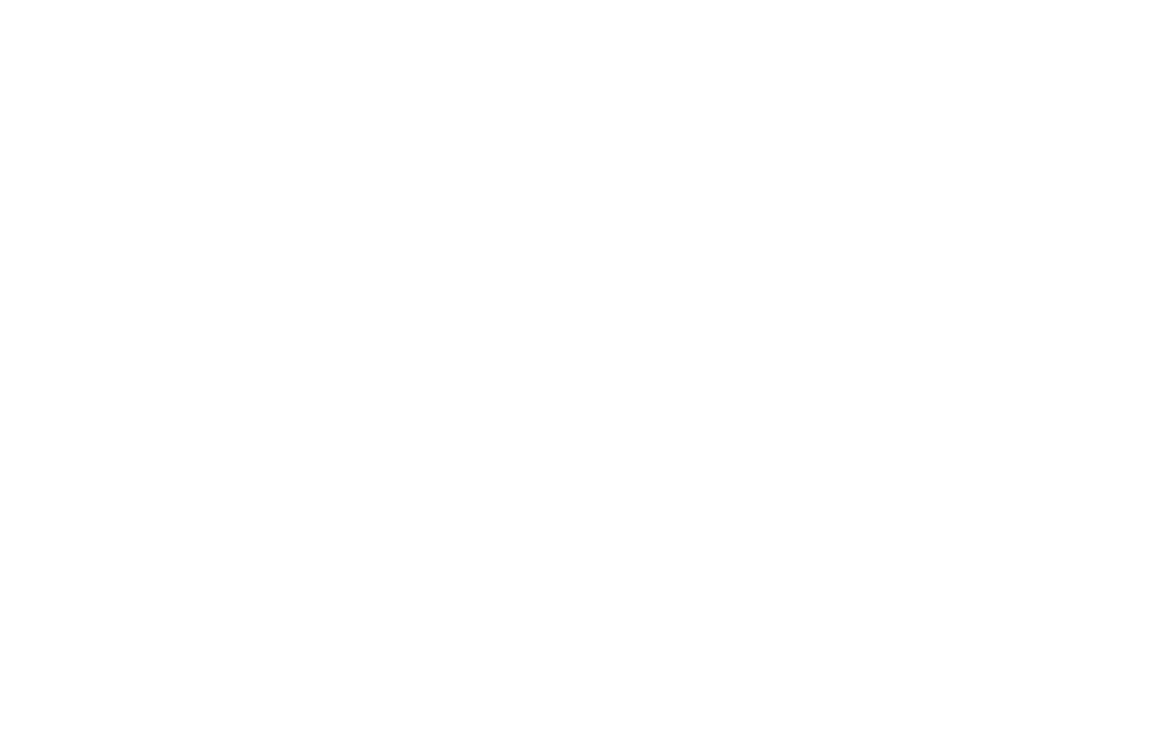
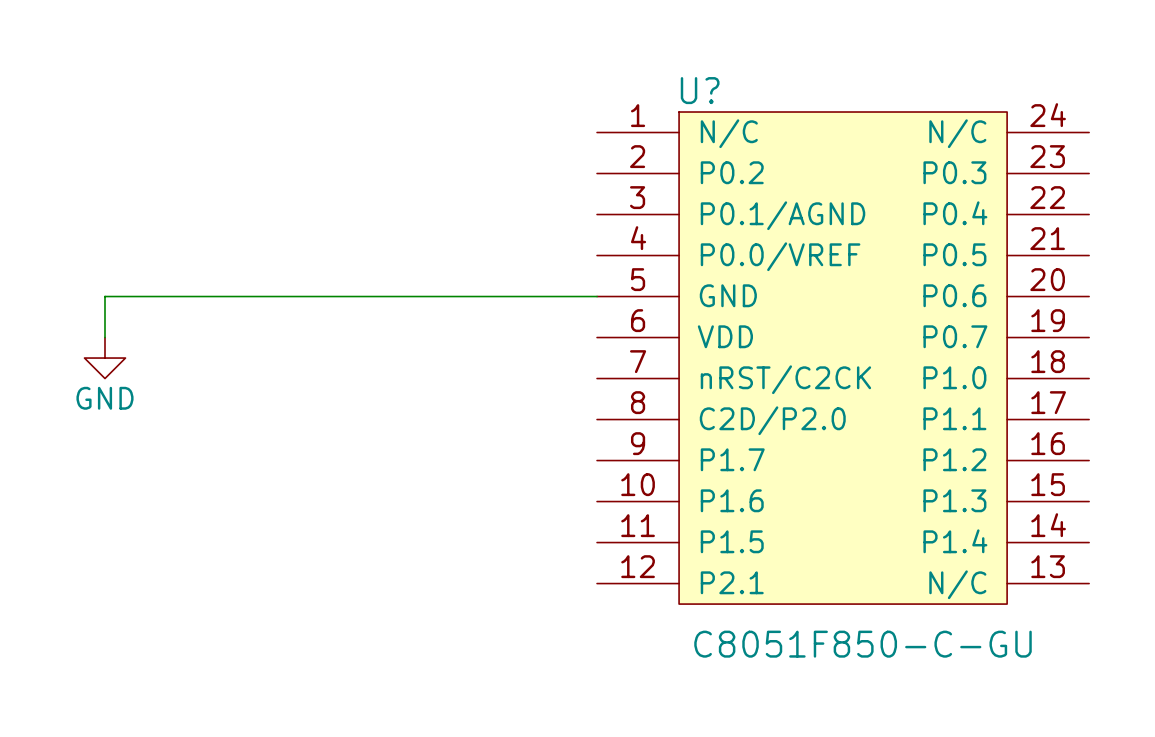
wire: none -> (597, 296) (104, 296) (104, 337)
power symbol: none -> GND (104, 358)
U?: none -> C8051F850-C-GU (843, 358)

